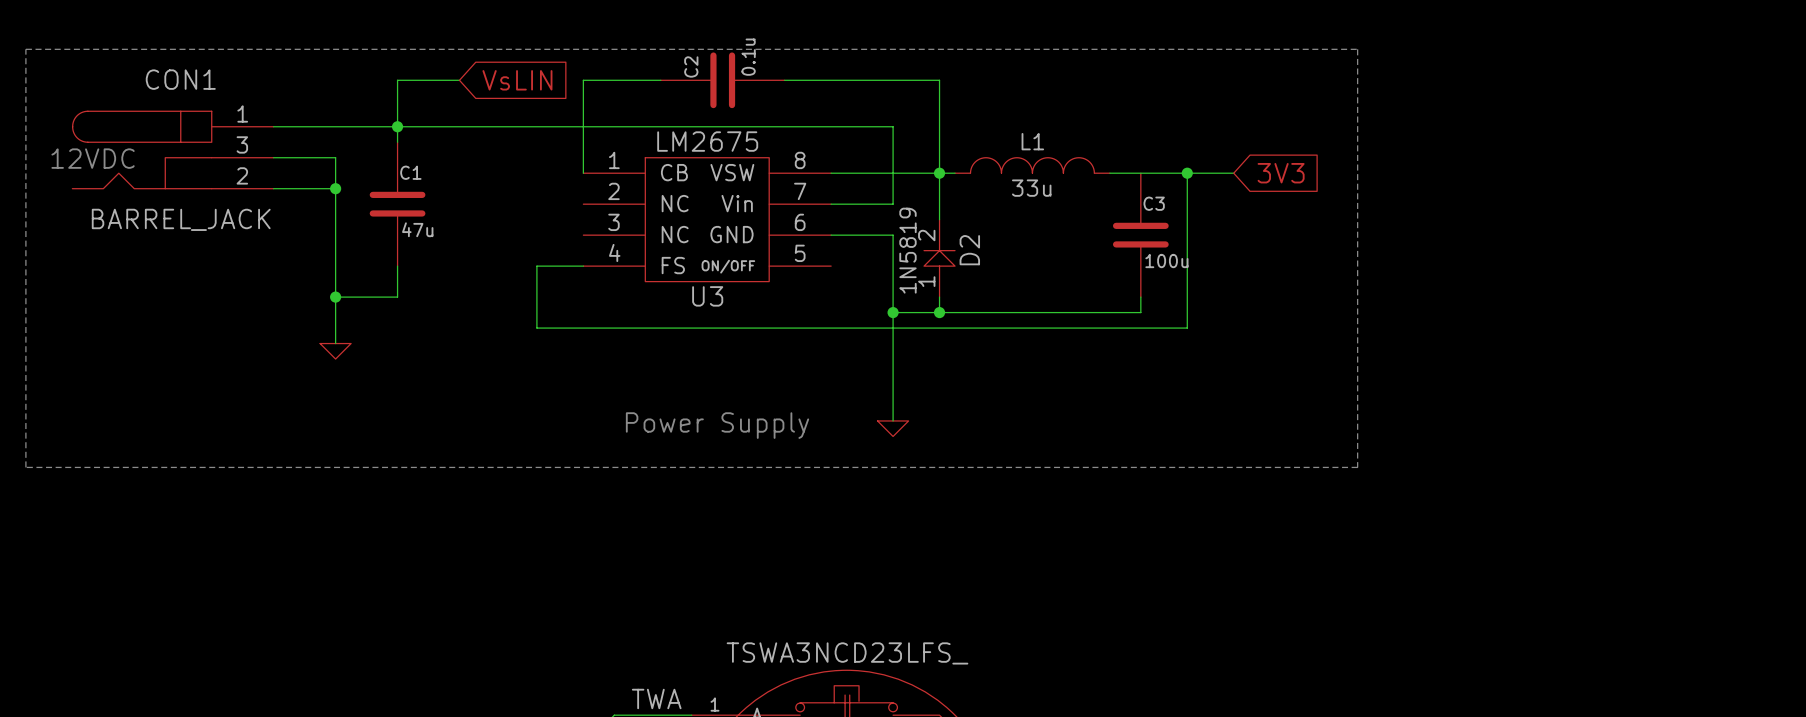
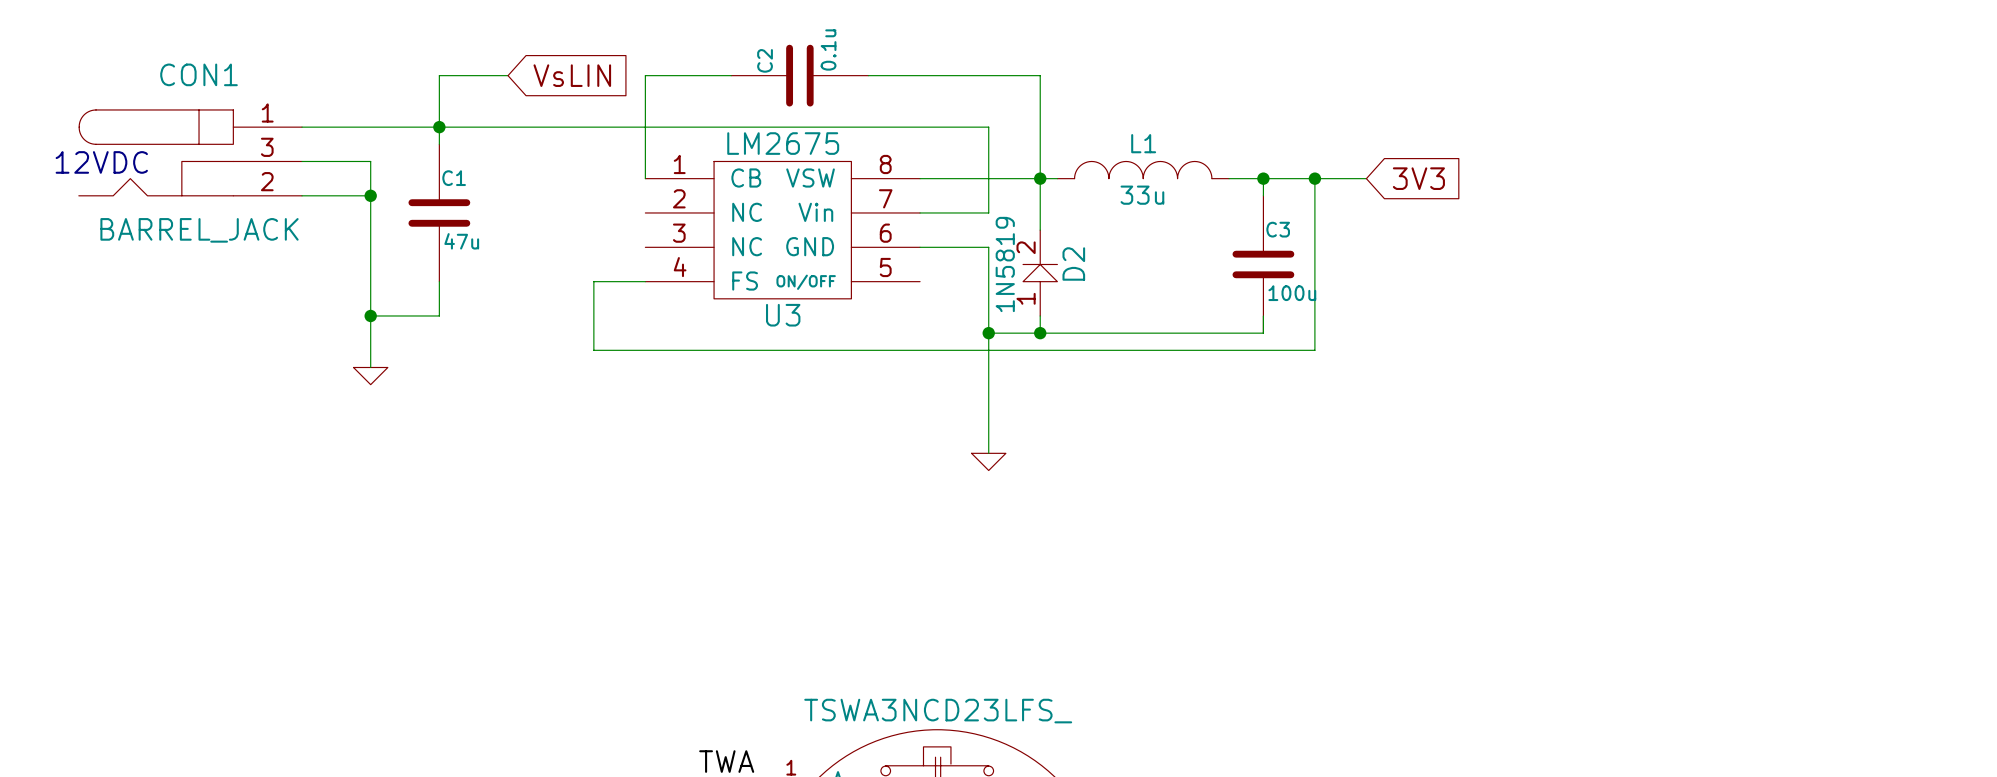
line: (25, 49) (25, 467) (1357, 467) (1357, 49) (25, 49) -> none
junction: none -> (1263, 178)
C3 position: (1140, 235) -> (1263, 264)
text: Power Supply (717, 425) -> none

